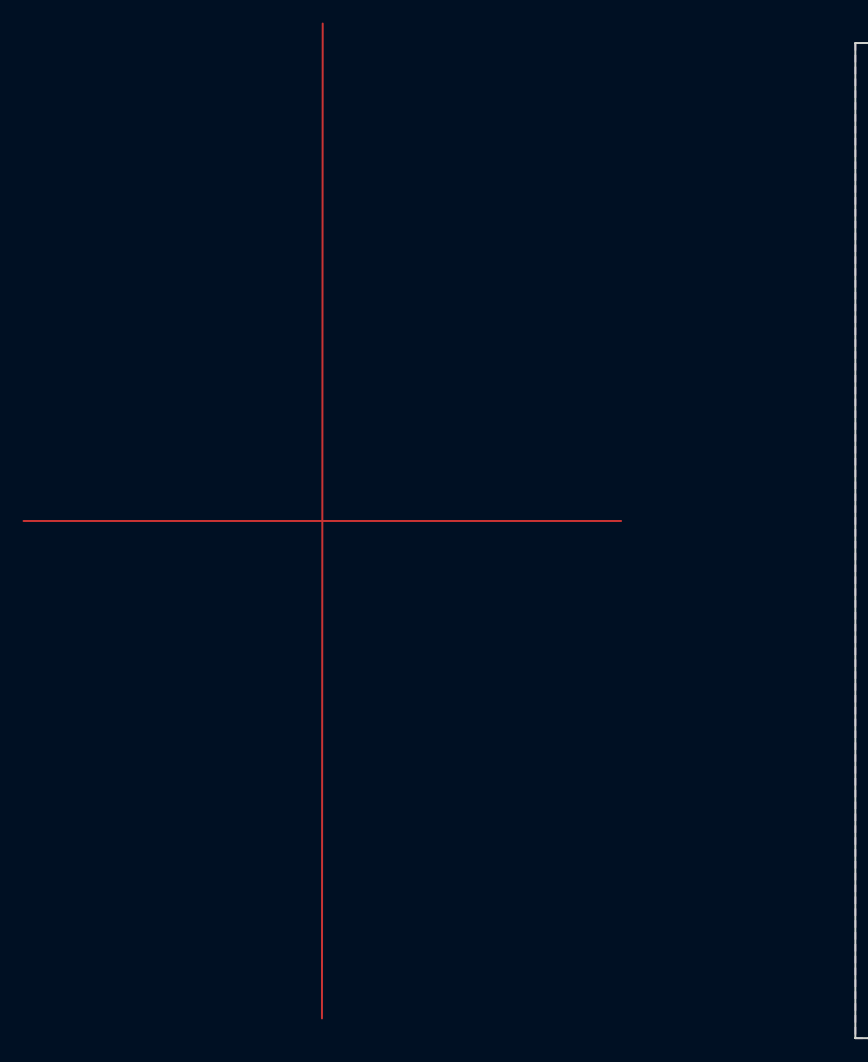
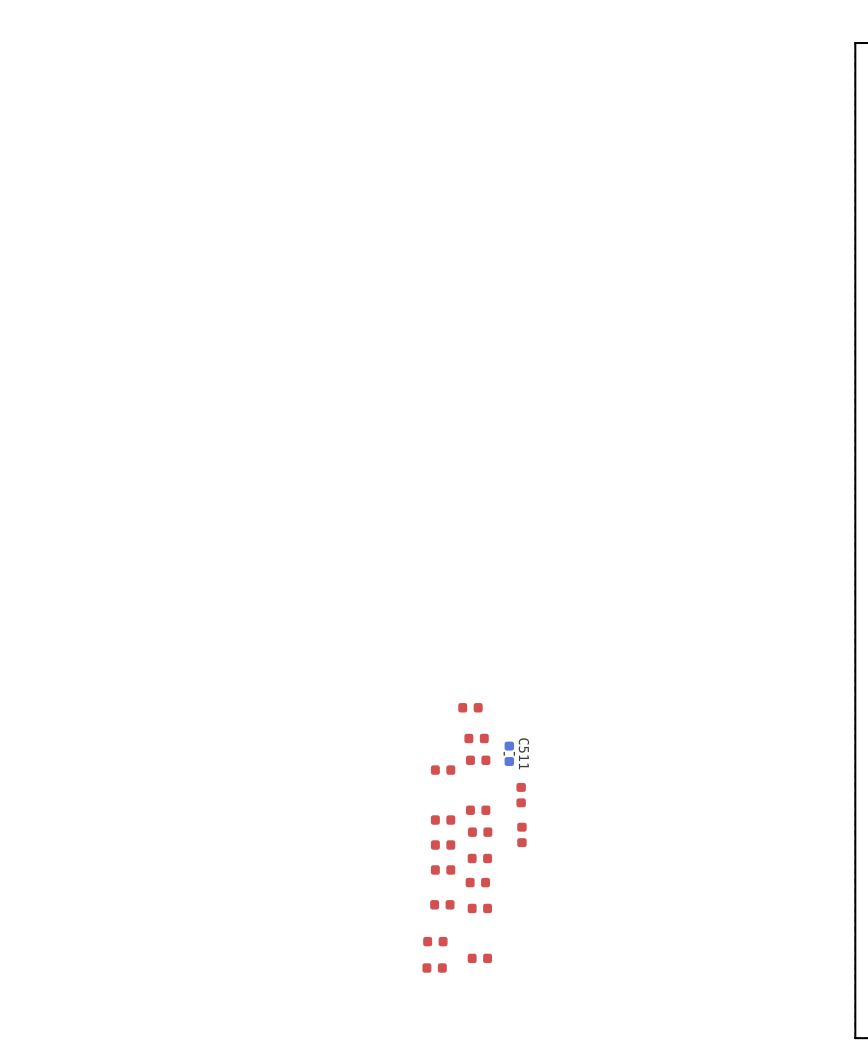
top track: (322, 23) (321, 1018) -> none
top track: (621, 520) (23, 520) -> none
part: none -> (470, 707)
part: none -> (476, 738)
C511: none -> (509, 753)
part: none -> (478, 760)
part: none -> (443, 770)
part: none -> (521, 795)
part: none -> (478, 810)
part: none -> (443, 820)
part: none -> (480, 832)
part: none -> (521, 834)
part: none -> (443, 845)
part: none -> (479, 858)
part: none -> (443, 869)
part: none -> (477, 882)
part: none -> (442, 904)
part: none -> (479, 908)
part: none -> (435, 941)
part: none -> (479, 958)
part: none -> (434, 968)

